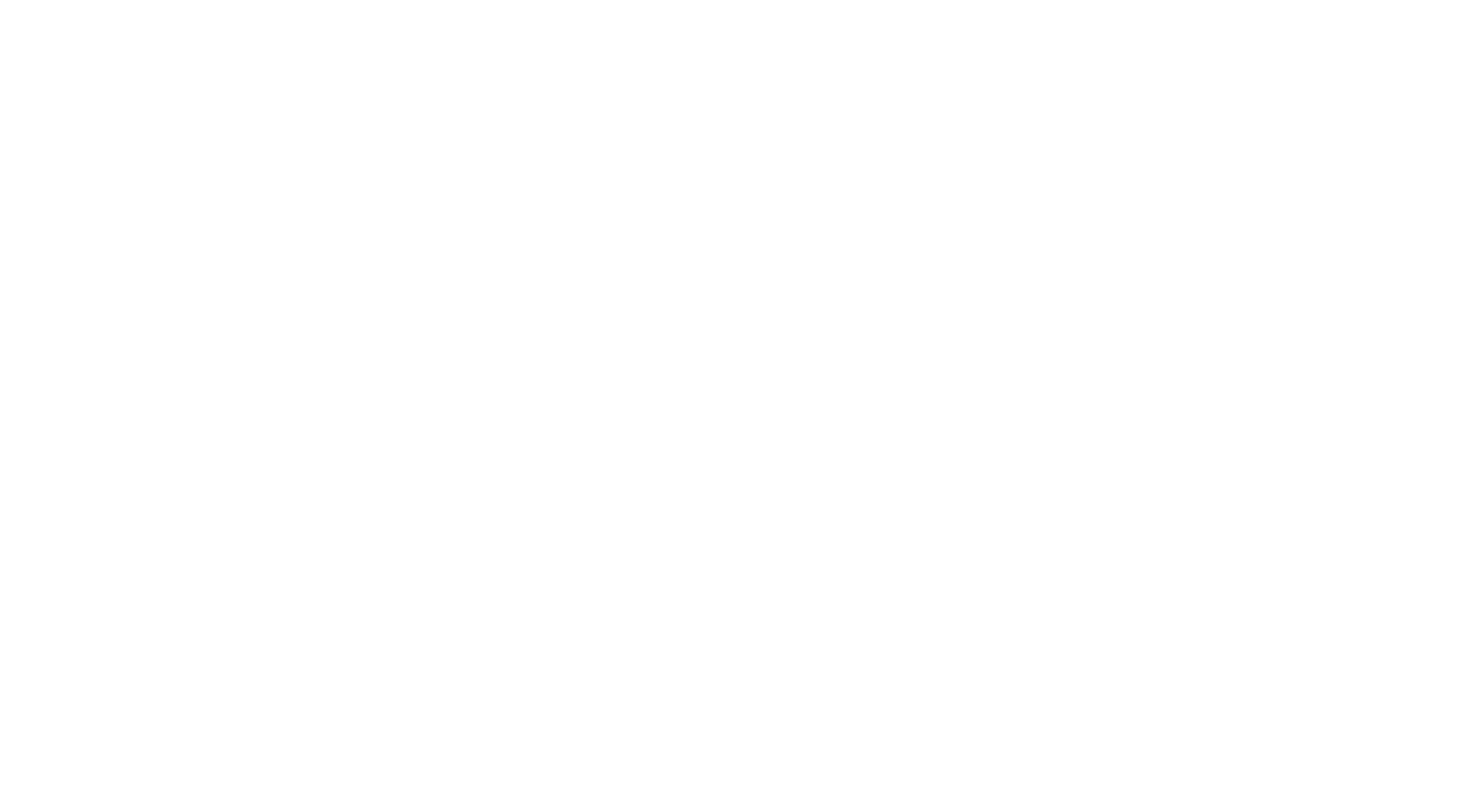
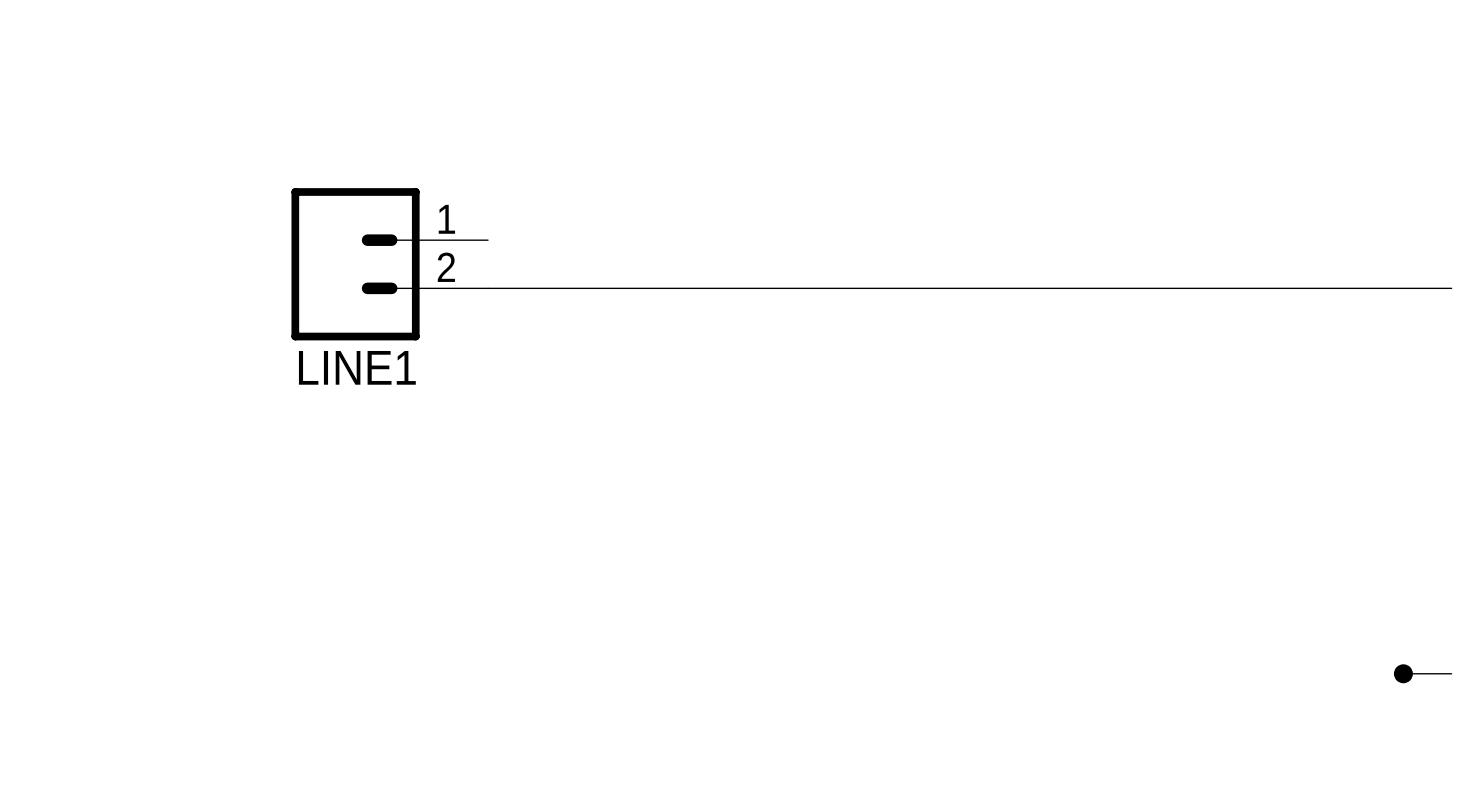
LINE1: none -> (389, 264)
wire: none -> (488, 288) (1451, 288)
wire: none -> (1403, 673) (1451, 673)
junction: none -> (1403, 673)

